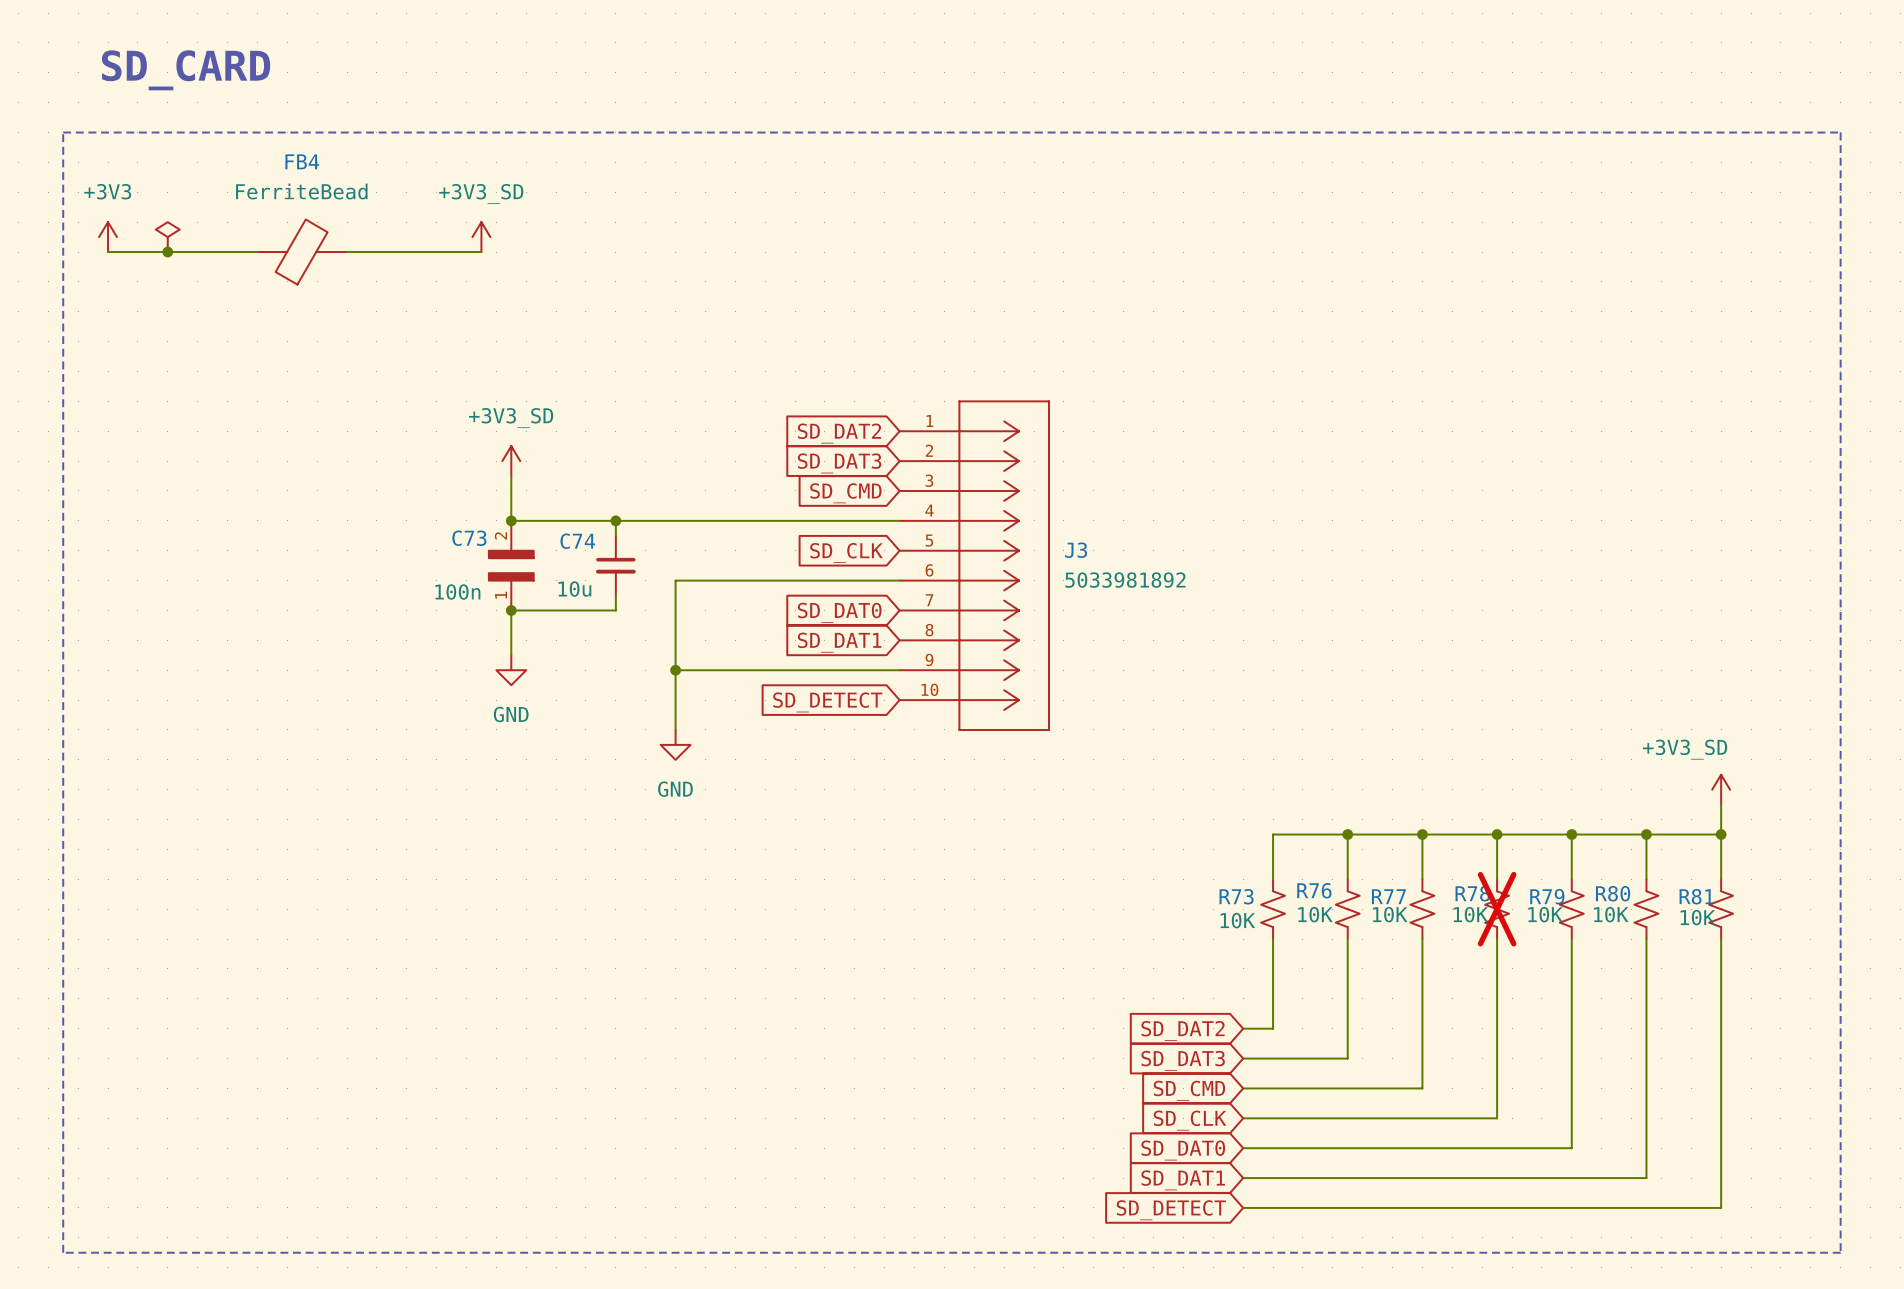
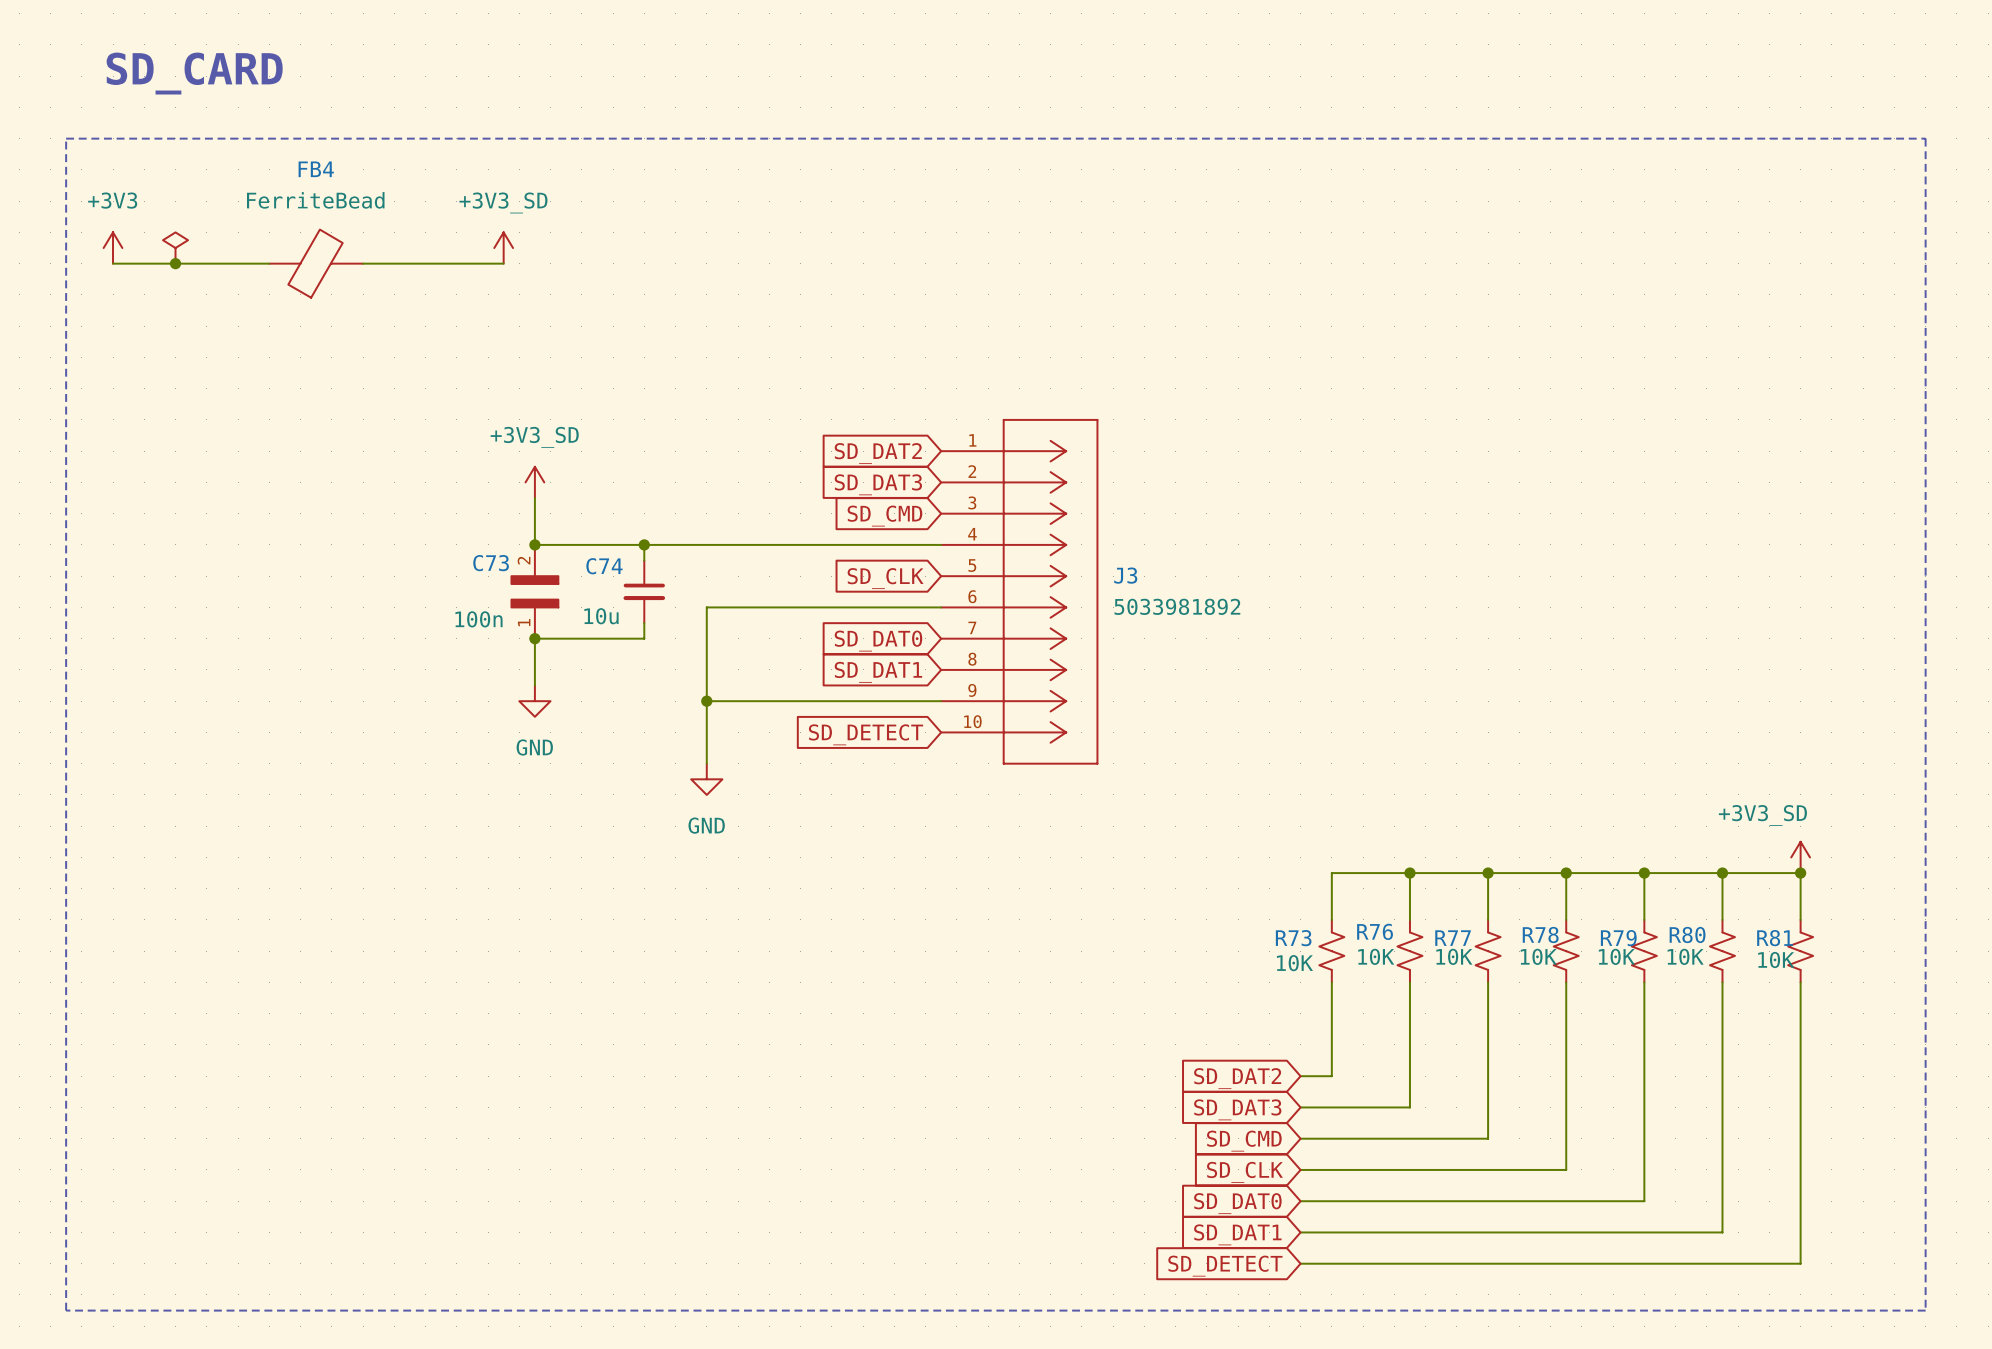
power symbol position: +3V3_SD (1721, 789) -> +3V3_SD (1800, 857)
R78 do-not-place cross: (1497, 909) -> none

